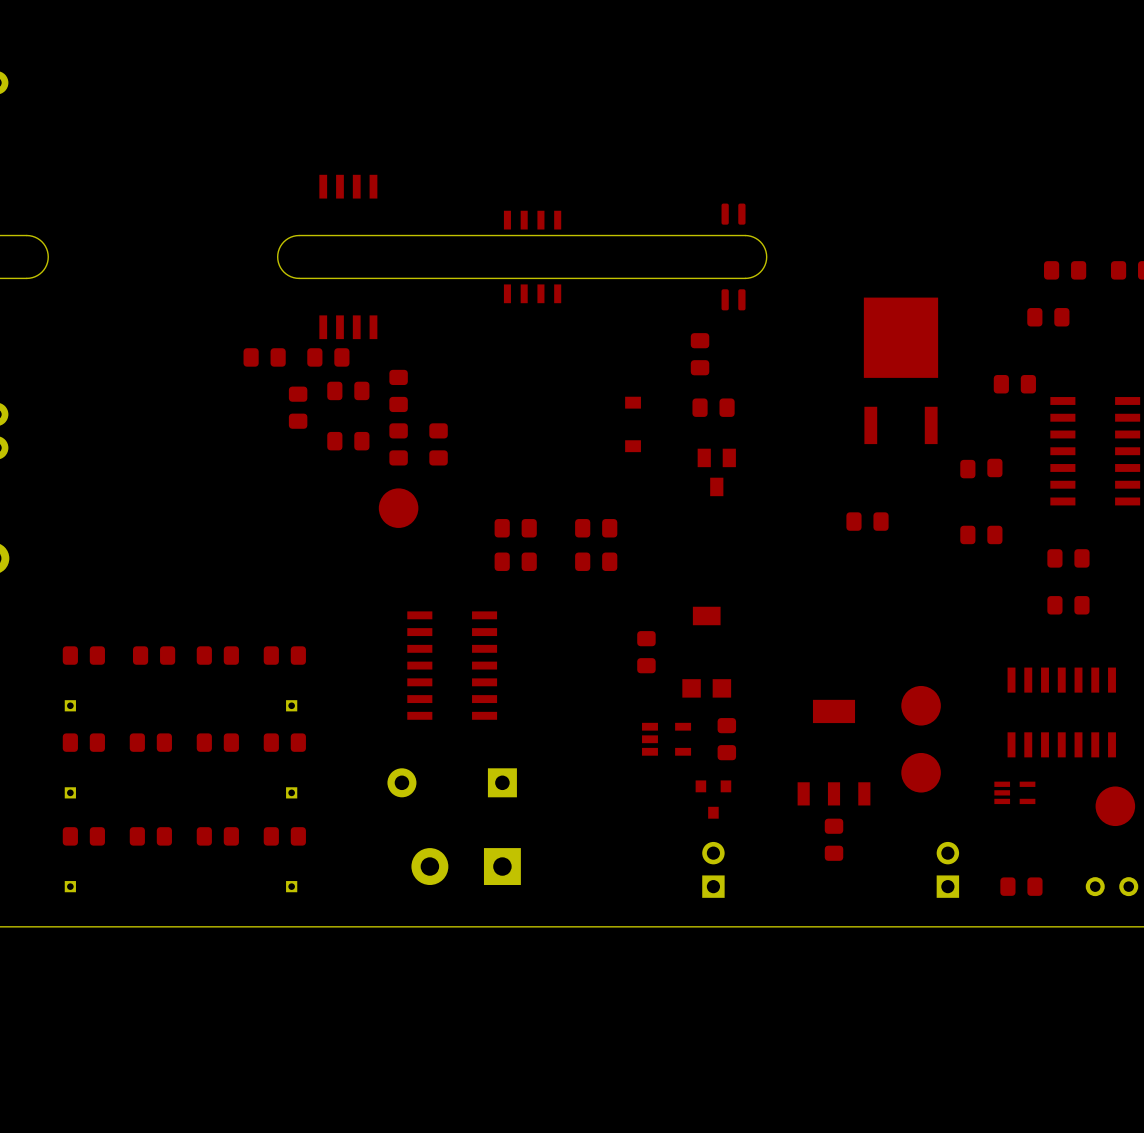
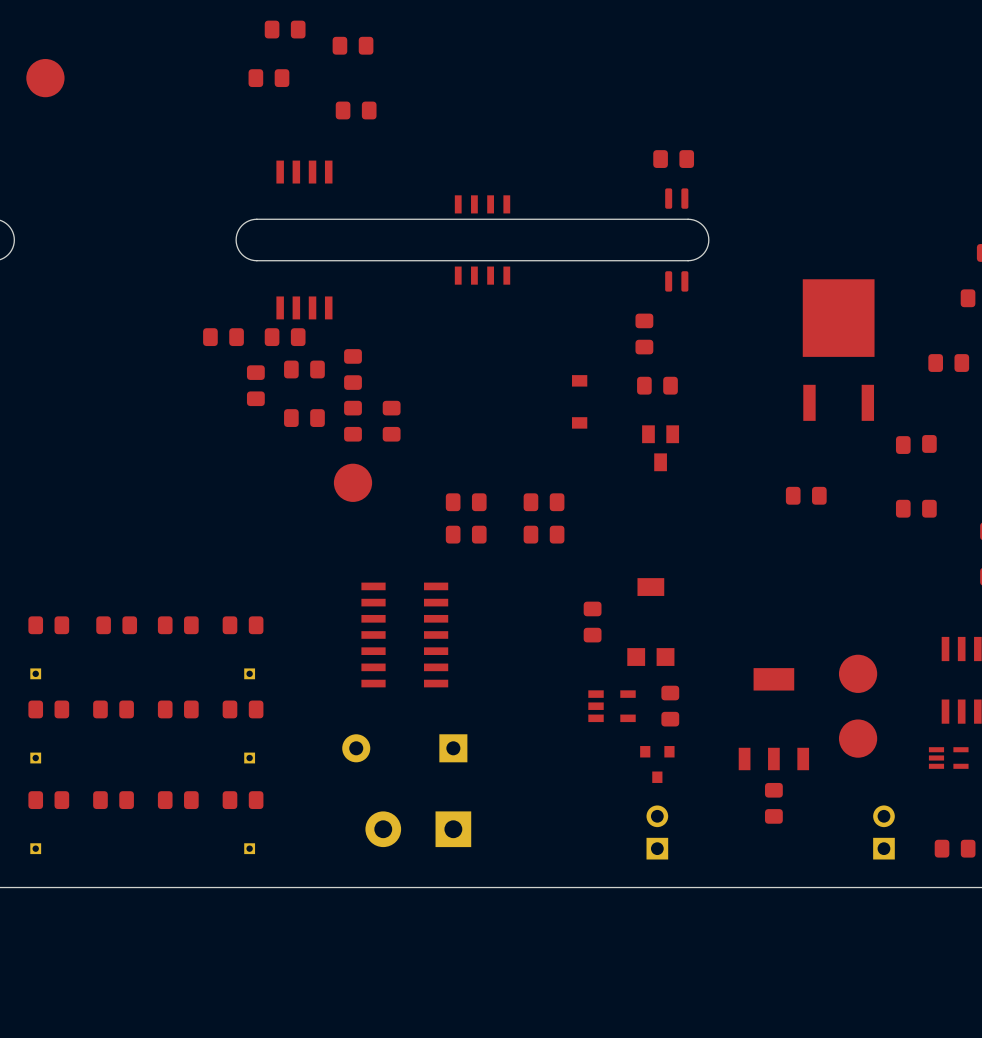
part: none -> (285, 29)
part: none -> (353, 45)
part: none -> (45, 78)
part: none -> (268, 78)
part: none -> (356, 110)
part: none -> (673, 159)

